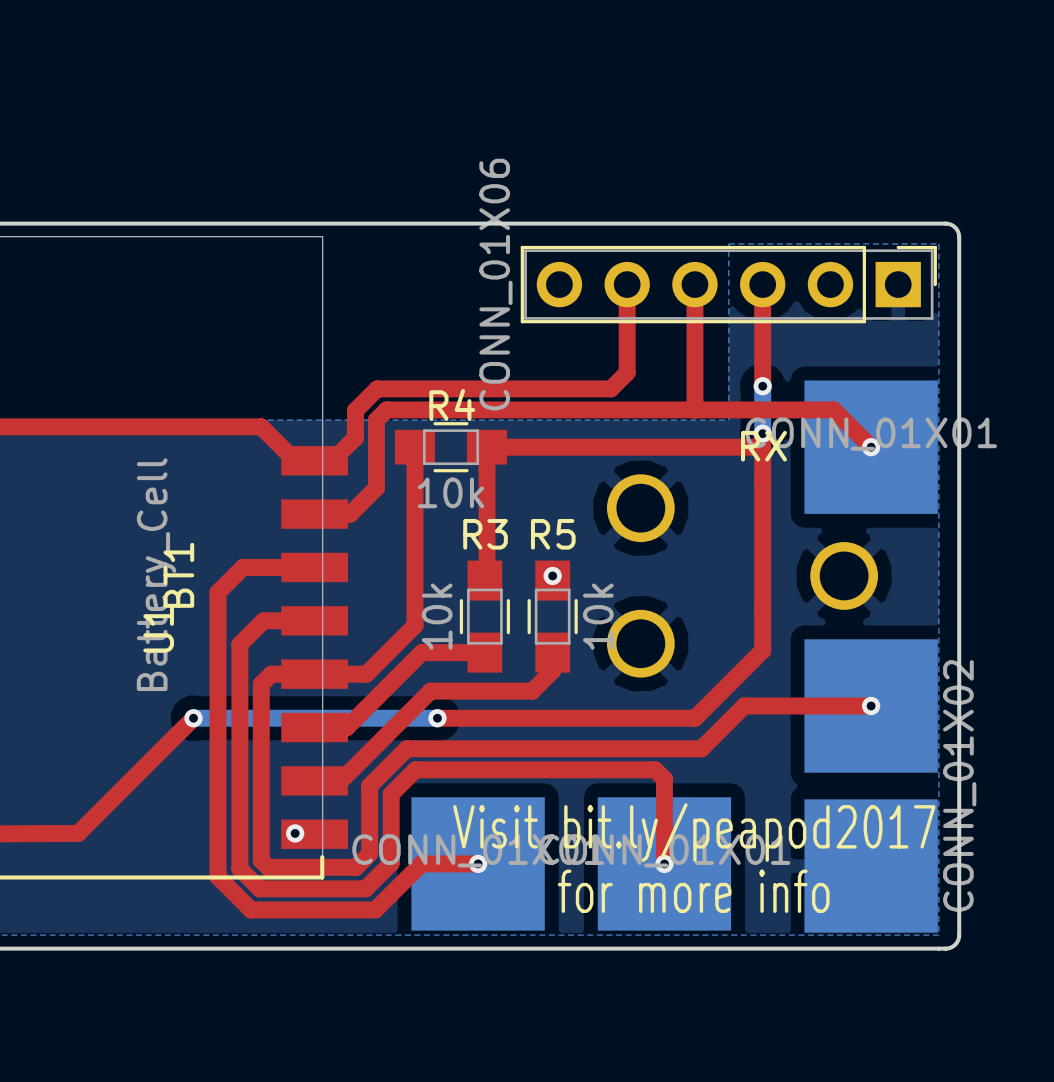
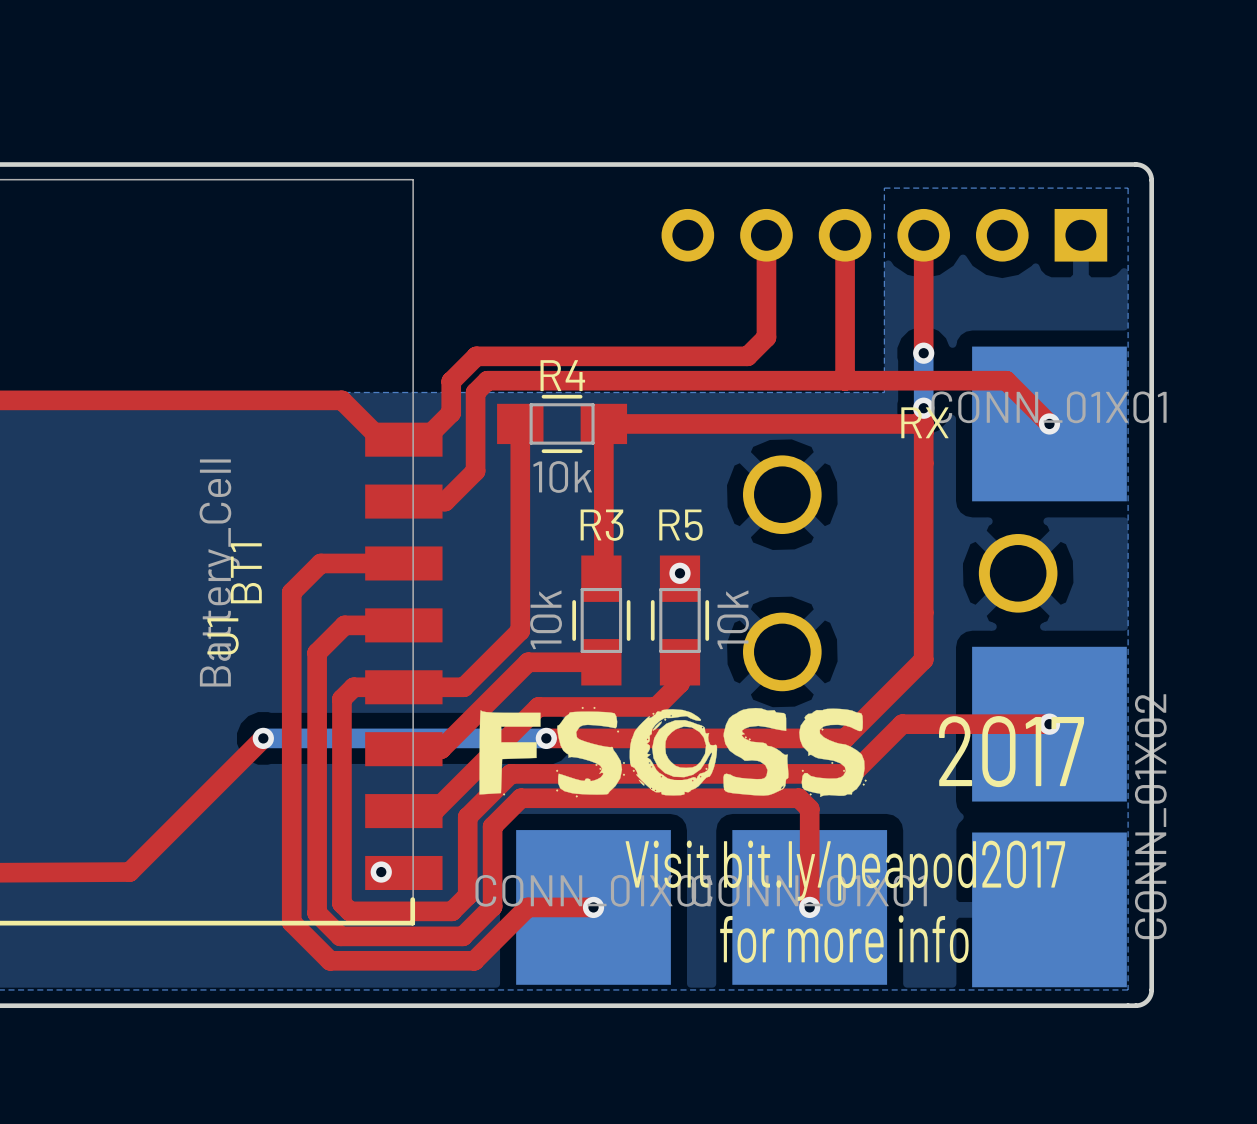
part side: top (728, 284) -> bottom (884, 235)
drawing: none -> [479, 706, 867, 798]
text: none -> 2017 (1011, 751)

